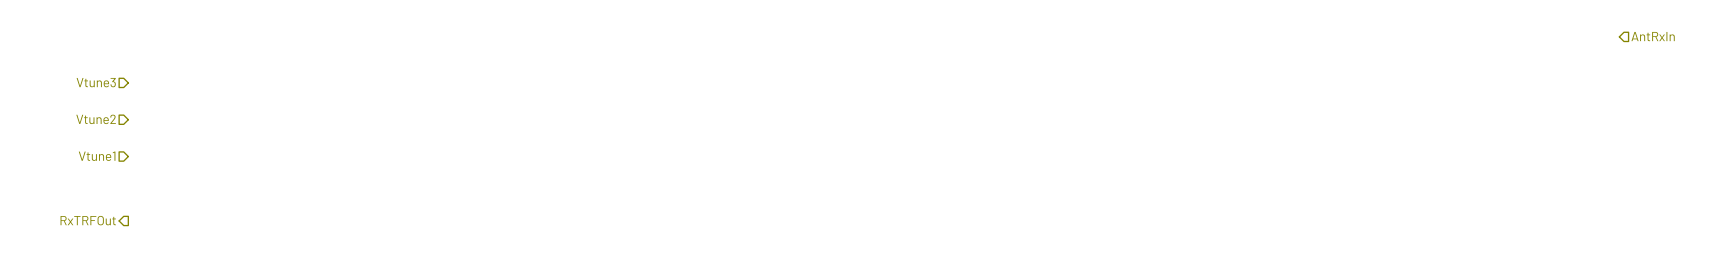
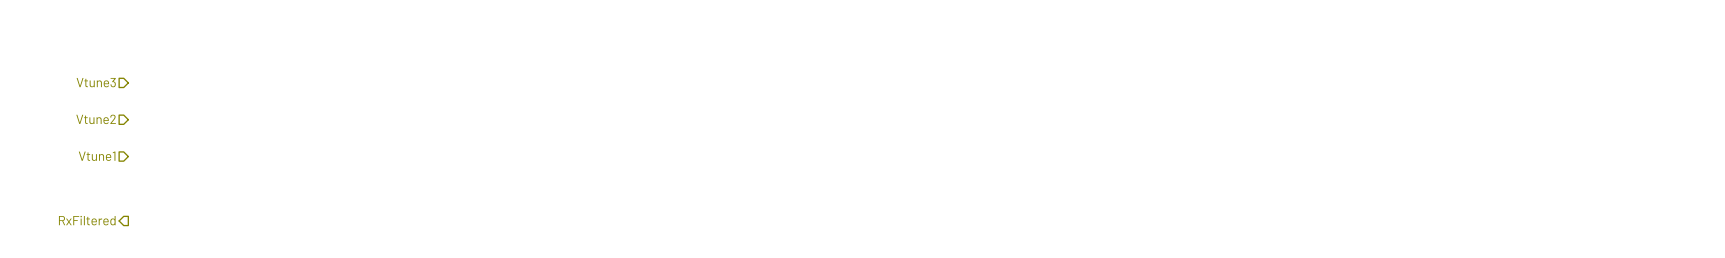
hierarchical label: AntRxIn (1653, 36) -> none
hierarchical label: RxTRFOut (88, 220) -> RxFiltered (87, 220)

